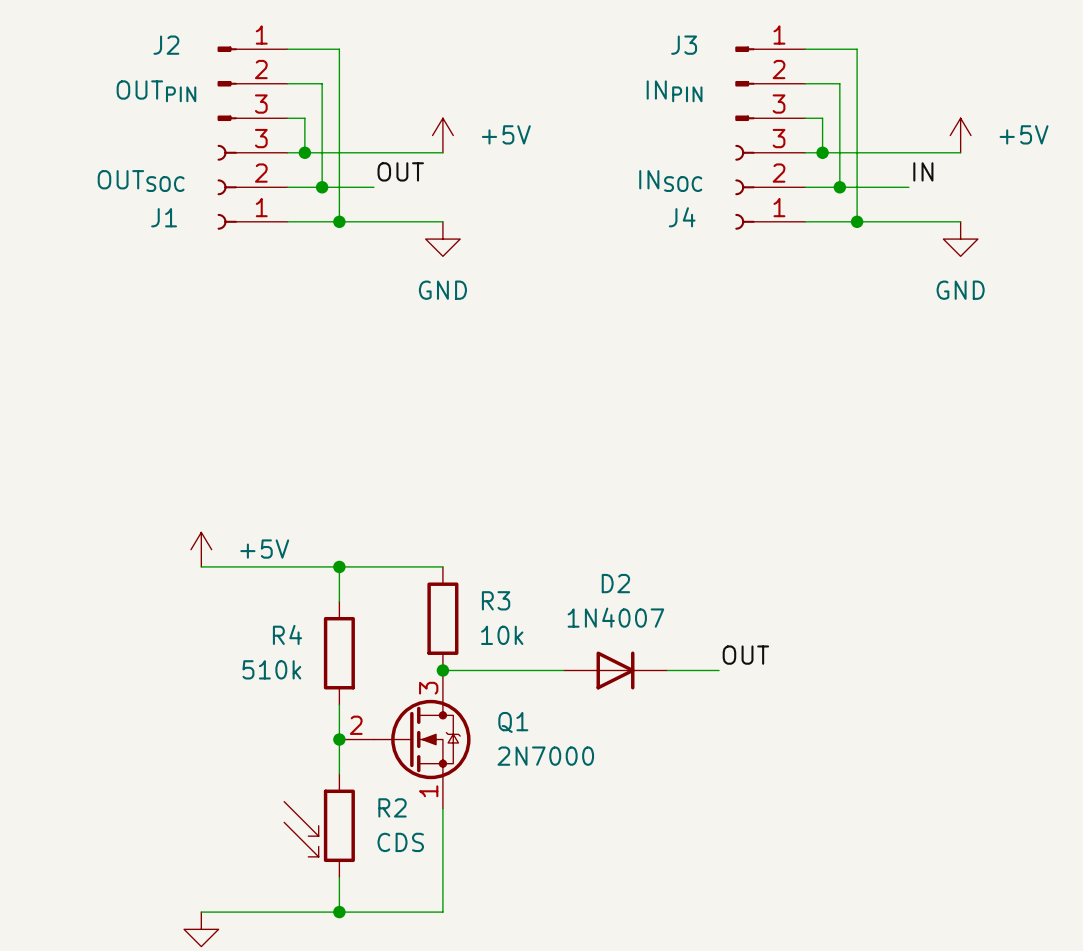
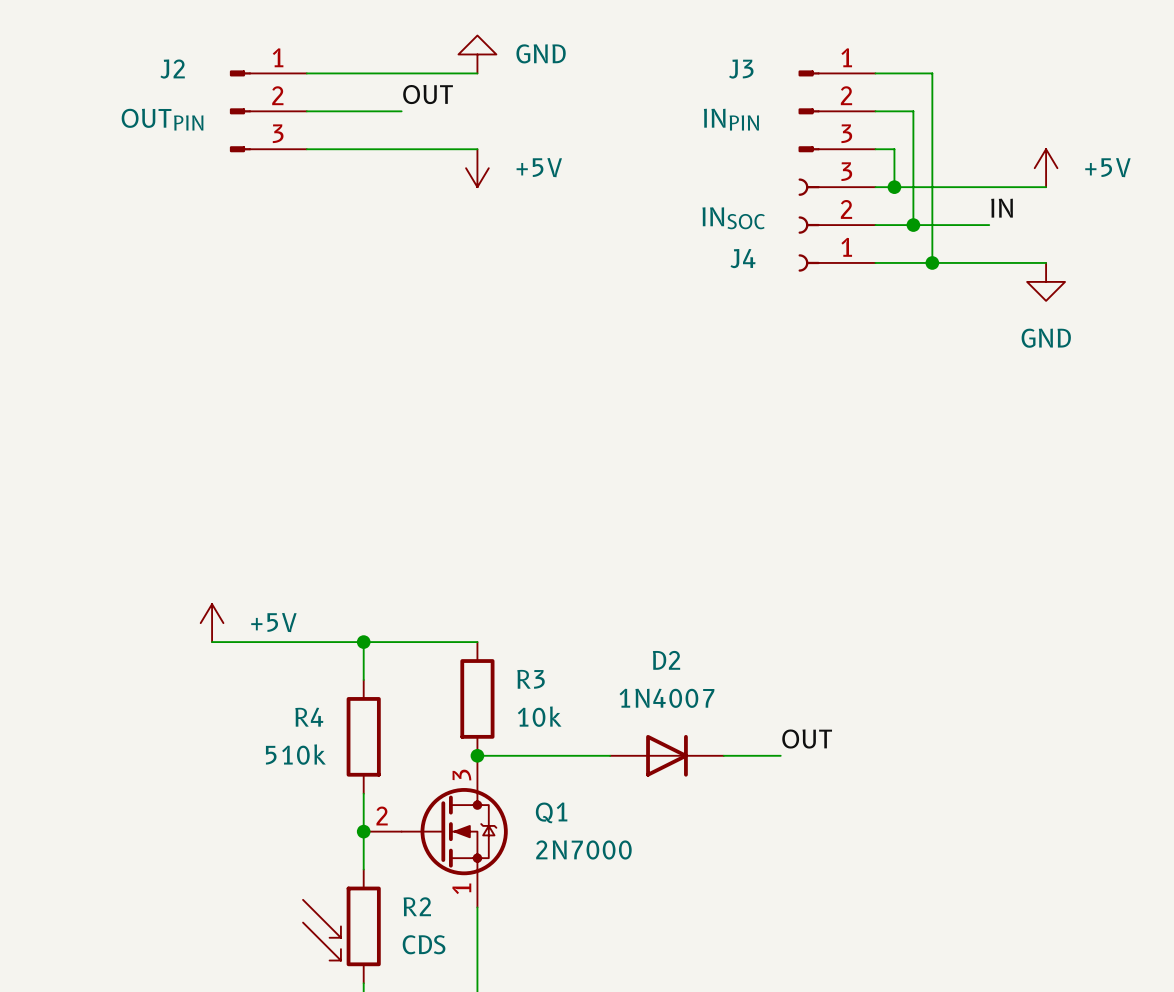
wire: (339, 49) (339, 221) -> (363, 73) (477, 73)
wire: (322, 83) (322, 187) -> (344, 111) (401, 111)
wire: (304, 118) (304, 152) -> (325, 149) (477, 149)
power symbol rotation: 0° (442, 135) -> 180° (477, 168)
wire: (287, 152) (442, 152) -> none
junction: (304, 152) -> none
label position: OUT (400, 171) -> OUT (428, 94)
J1: OUTSOC (252, 187) -> none
wire: (287, 187) (373, 187) -> none
junction: (322, 187) -> none
wire: (287, 221) (442, 221) -> none
junction: (339, 221) -> none
power symbol rotation: 0° (442, 239) -> 180° (477, 54)
power symbol position: GND (442, 239) -> GND (477, 54)
power symbol text position: GND (442, 290) -> GND (541, 53)

